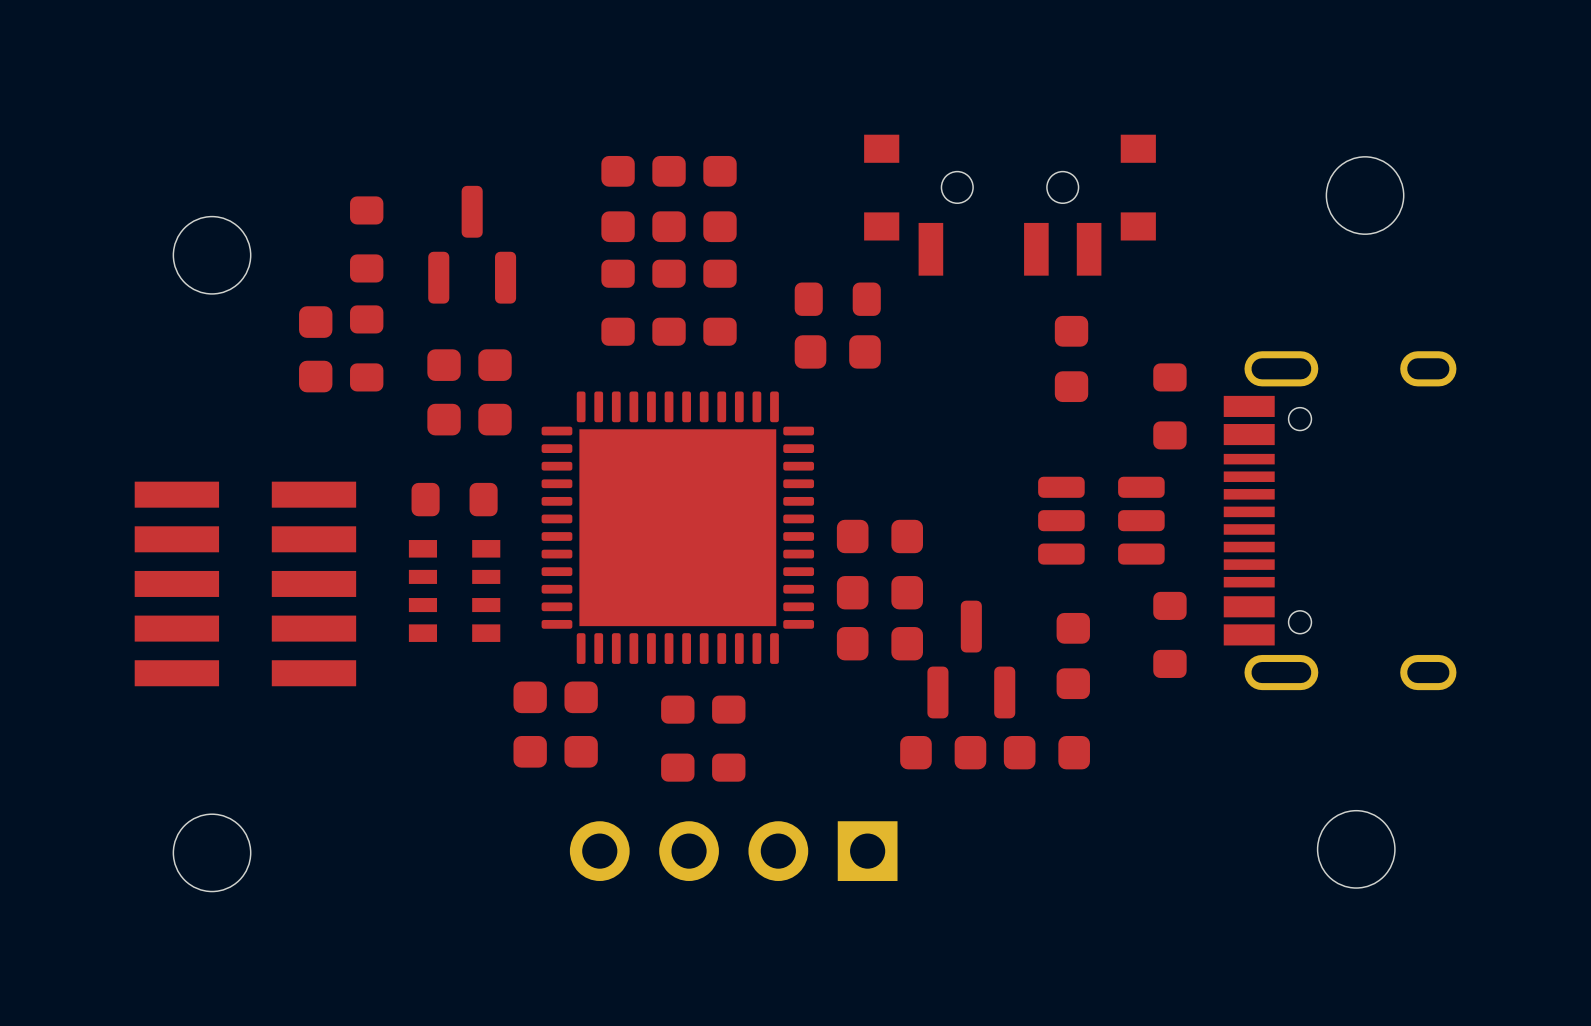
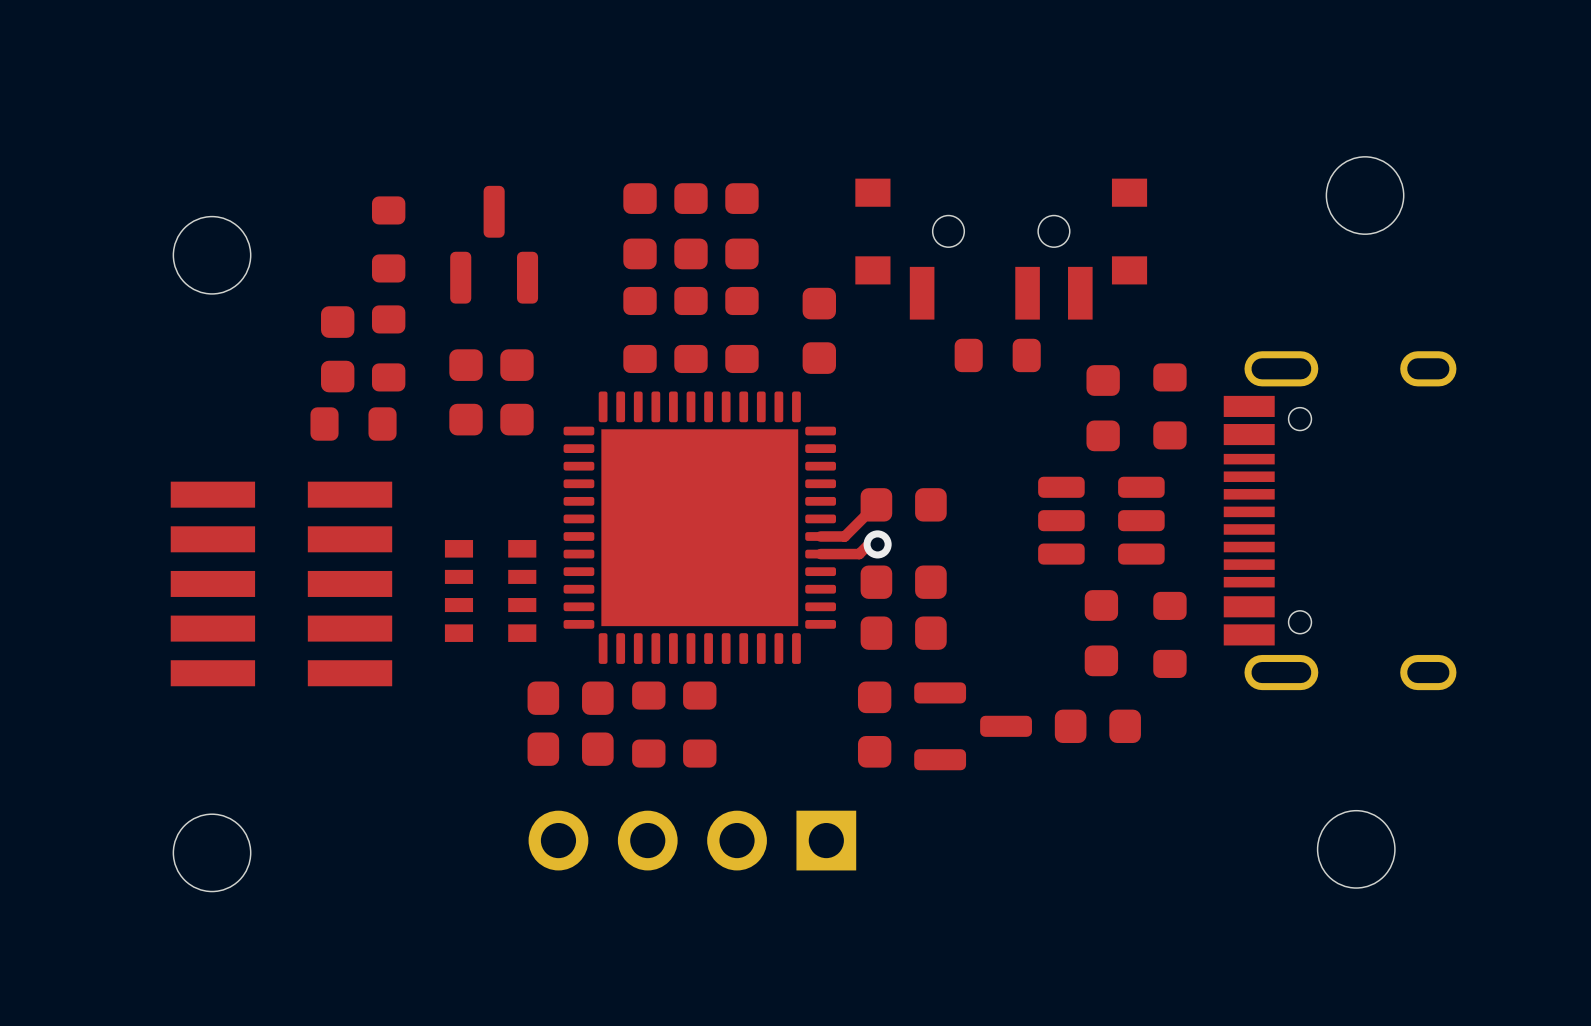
part: (618, 199) -> none
part: (669, 199) -> none
part: (719, 199) -> none
part position: (1010, 205) -> (1001, 249)
part: none -> (640, 226)
part: none -> (690, 226)
part: none -> (741, 226)
part position: (366, 239) -> (388, 239)
part position: (472, 244) -> (494, 244)
part: (837, 299) -> none
part: (618, 302) -> none
part: (669, 302) -> none
part: (719, 302) -> none
part: none -> (640, 329)
part: none -> (690, 329)
part: none -> (741, 329)
part position: (366, 348) -> (388, 348)
part position: (315, 349) -> (337, 349)
part rotation: 0° (837, 351) -> 90° clockwise (819, 330)
part: none -> (997, 355)
part position: (1071, 358) -> (1103, 408)
part: (444, 392) -> none
part: none -> (466, 392)
part: (495, 392) -> none
part: none -> (516, 392)
part: none -> (353, 424)
part: (454, 499) -> none
top track: none -> (876, 504) (844, 536) (820, 536)
part: none -> (903, 504)
part position: (677, 527) -> (699, 527)
part: (879, 536) -> none
top track: none -> (877, 544) (868, 544) (859, 554) (820, 554)
via: none -> (877, 544)
part: none -> (903, 582)
part position: (245, 583) -> (281, 583)
part position: (454, 590) -> (490, 590)
part: (879, 592) -> none
part: none -> (903, 633)
part: (879, 643) -> none
part position: (1073, 656) -> (1101, 633)
part rotation: 0° (971, 659) -> 90° clockwise (973, 726)
part: none -> (570, 698)
part: (530, 724) -> none
part: (581, 724) -> none
part: none -> (648, 724)
part: none -> (699, 724)
part: none -> (874, 724)
part: (677, 738) -> none
part: (728, 738) -> none
part: none -> (570, 749)
part: (943, 752) -> none
part position: (1046, 752) -> (1097, 726)
part position: (733, 851) -> (692, 840)

